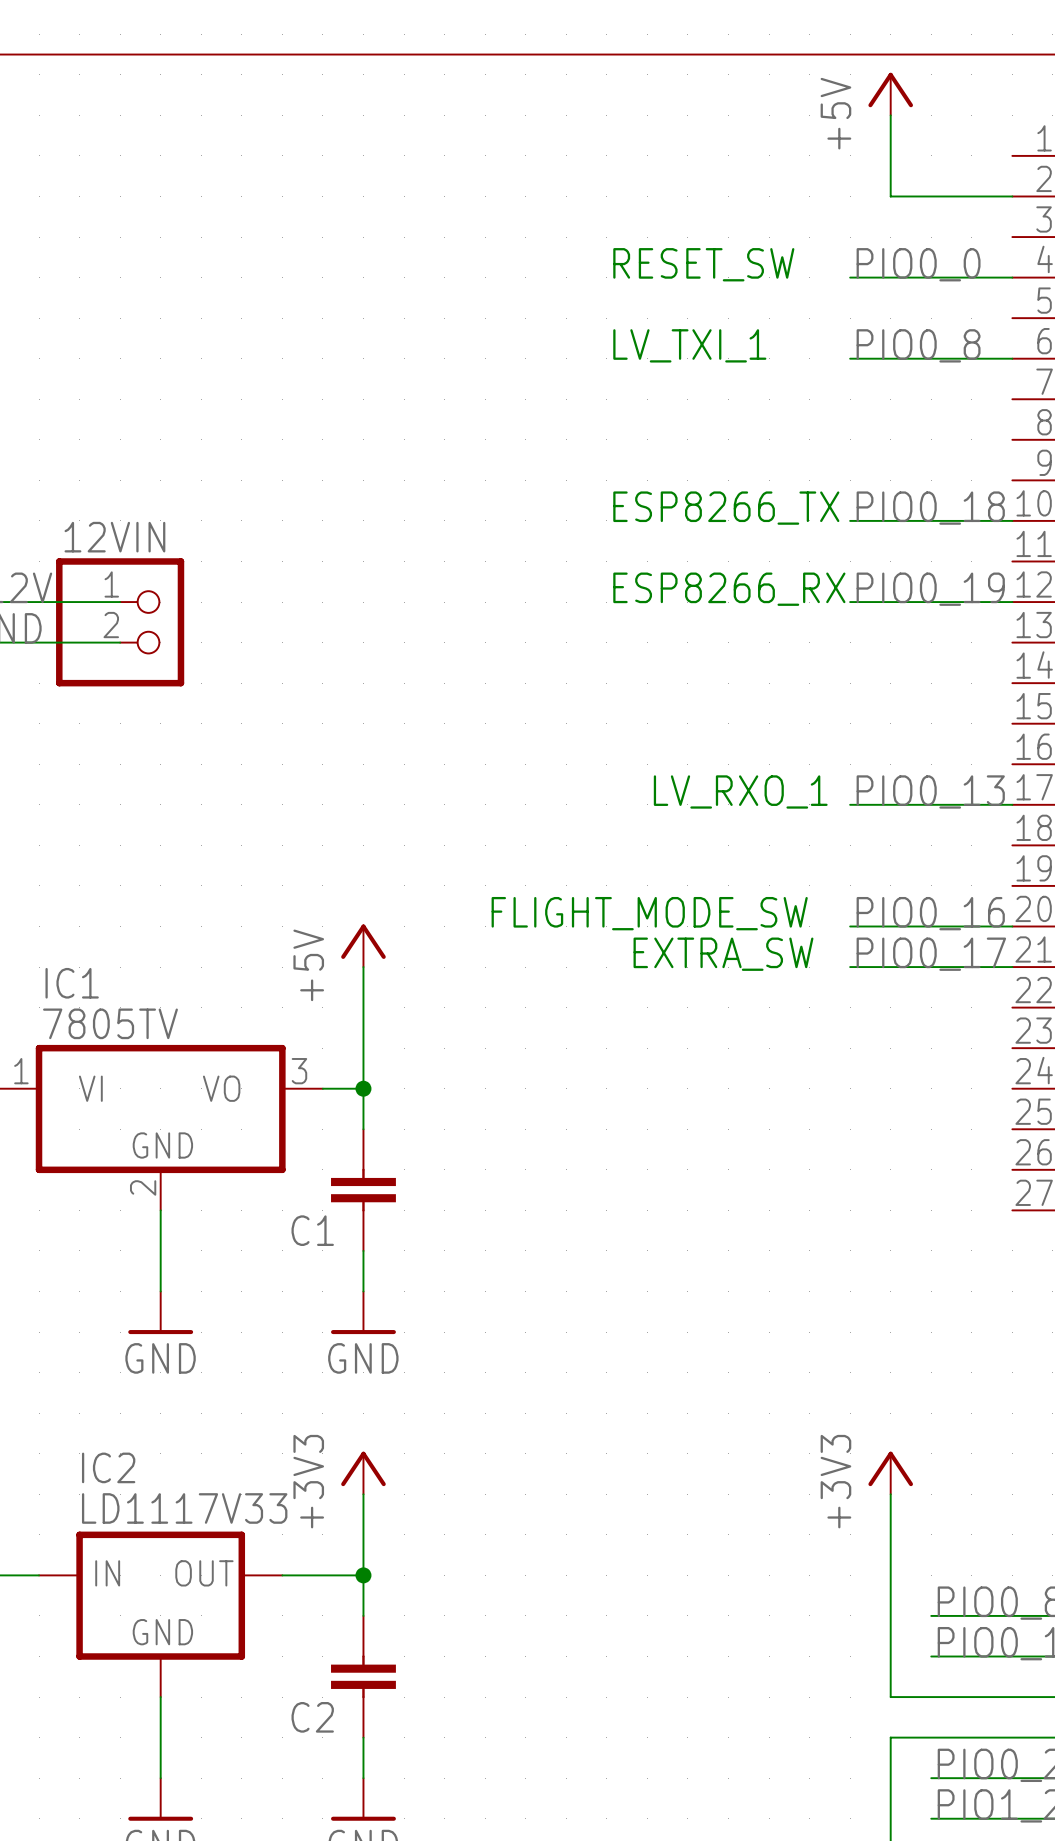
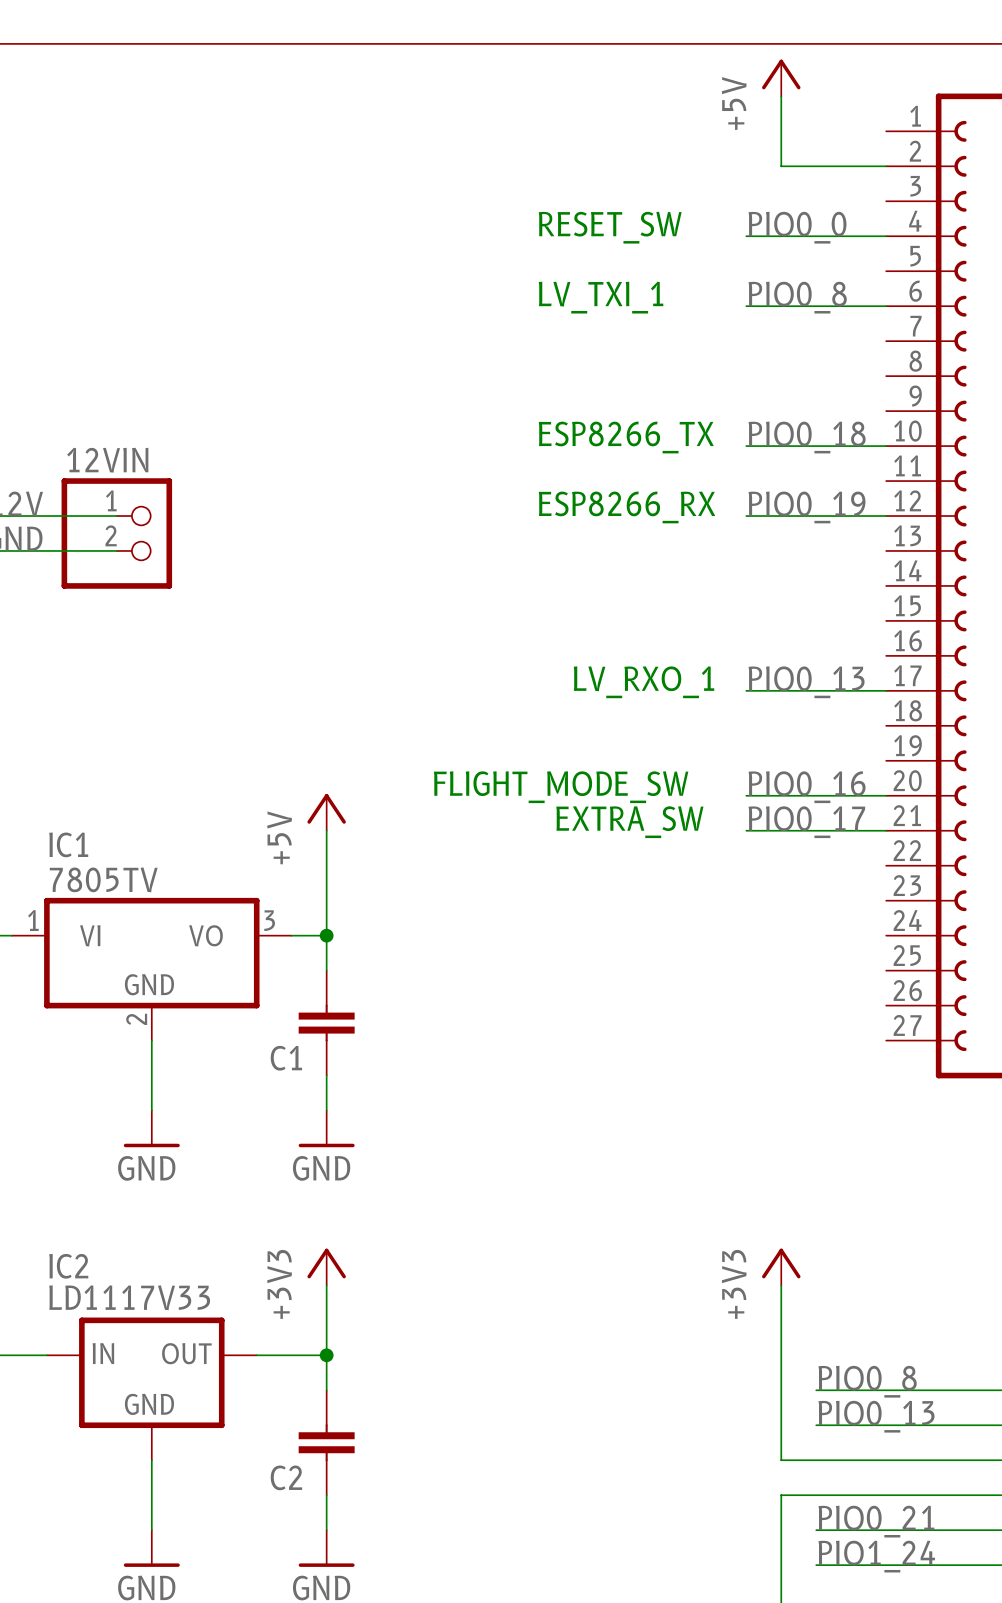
IC2 name position: IC2 (108, 1467) -> IC2 (68, 1266)
IC2 value position: LD1117V33 (184, 1508) -> LD1117V33 (129, 1297)

